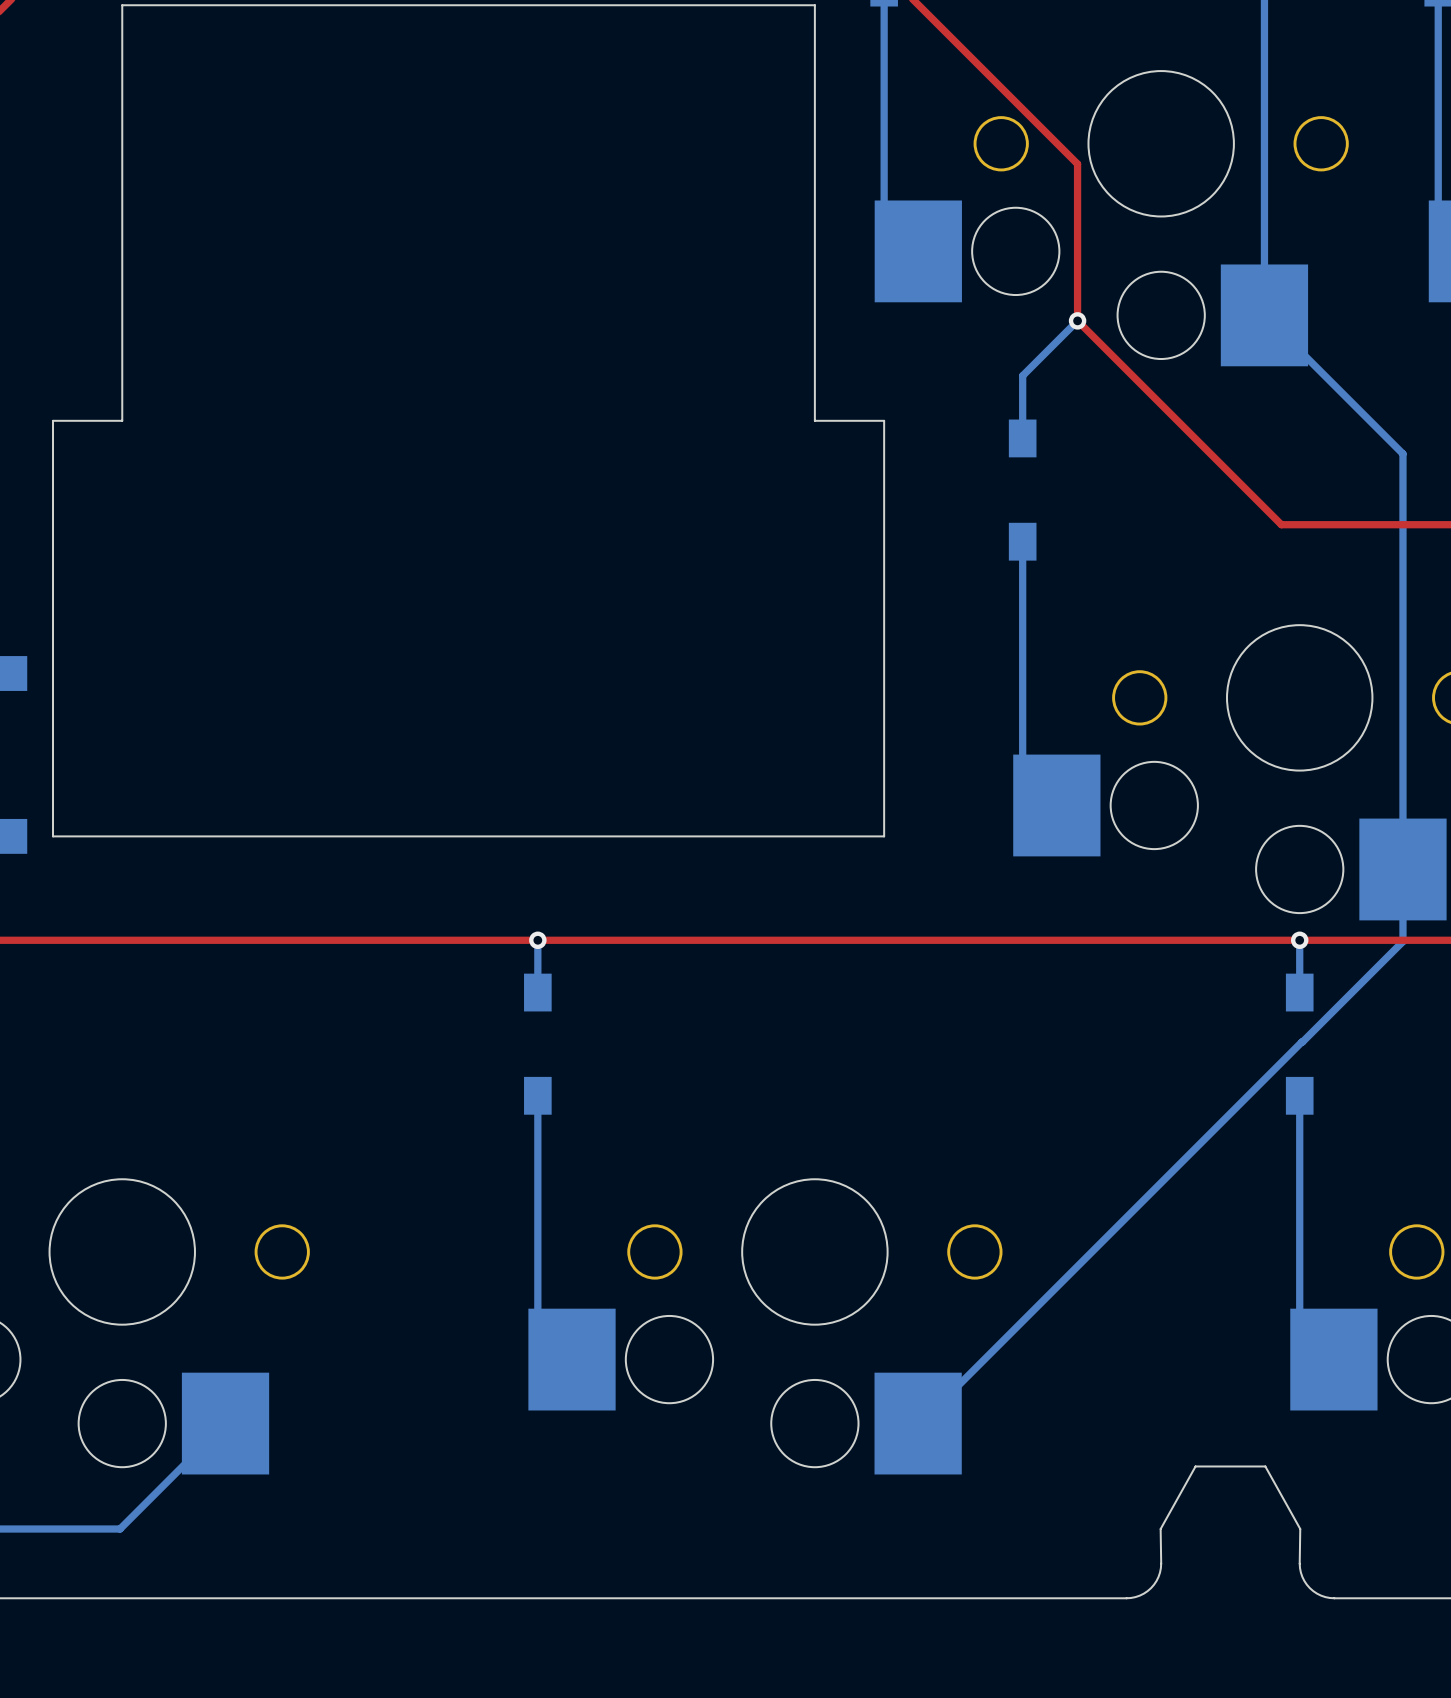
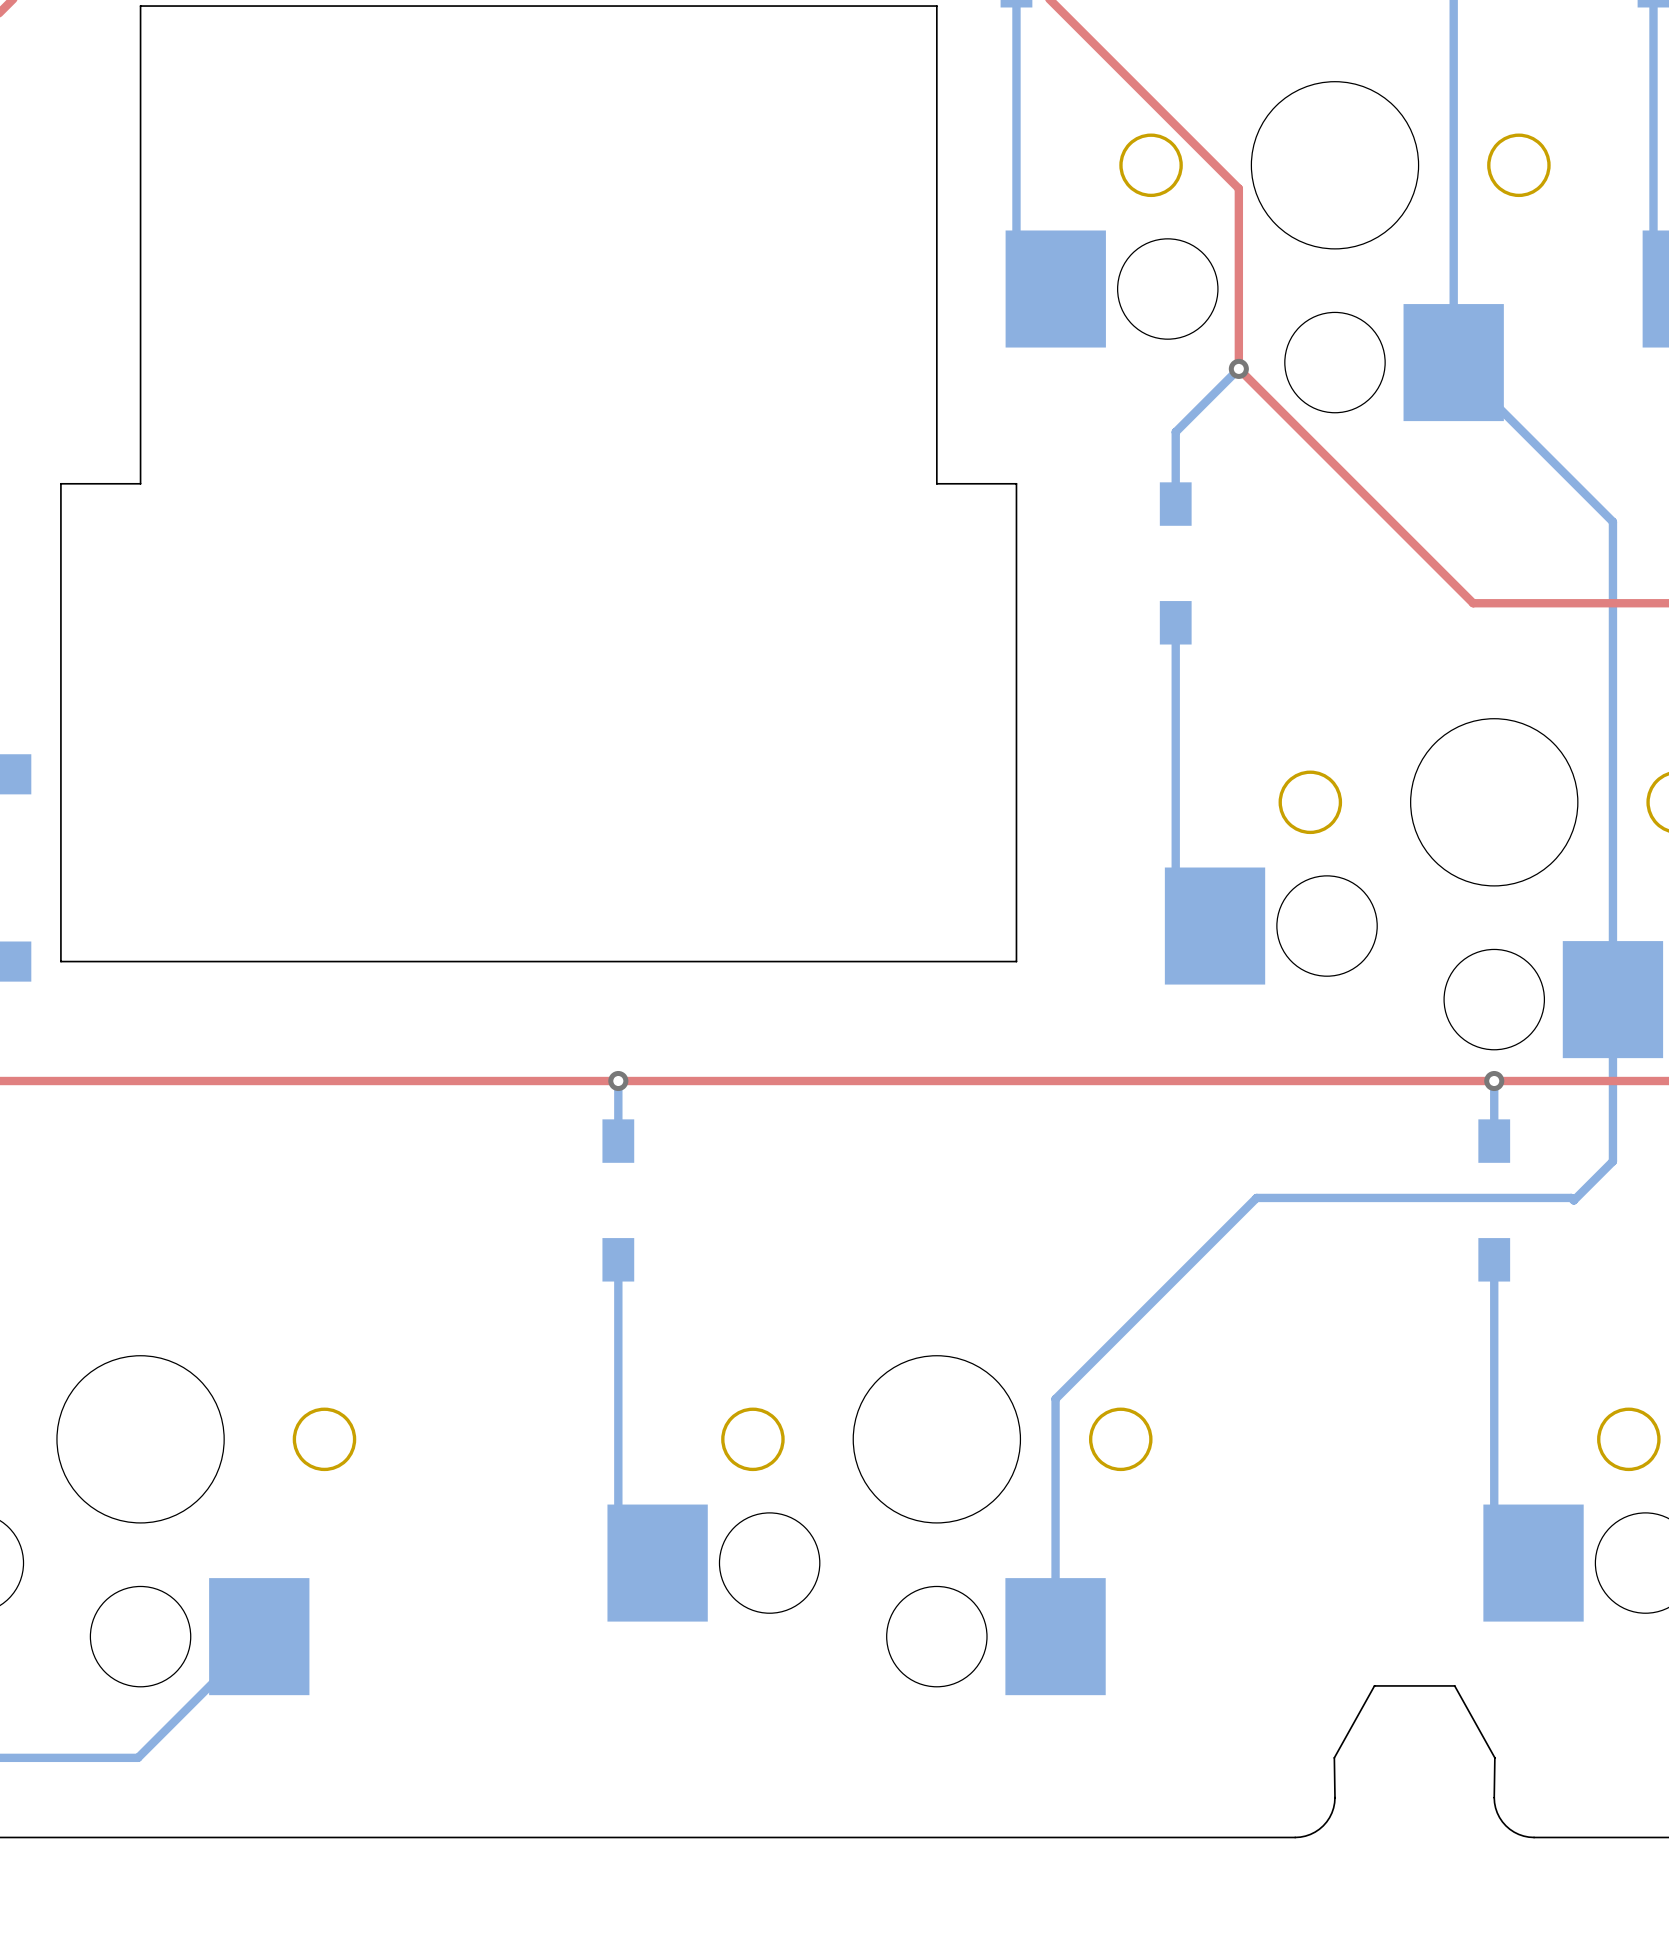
bottom track: (1402, 941) (1302, 1041) -> (1612, 1082) (1612, 1161) (1573, 1200) (1571, 1197) (1497, 1197)
bottom track: (1301, 1041) (920, 1423) (918, 1423) -> (1496, 1197) (1256, 1197) (1055, 1399) (1055, 1636)

